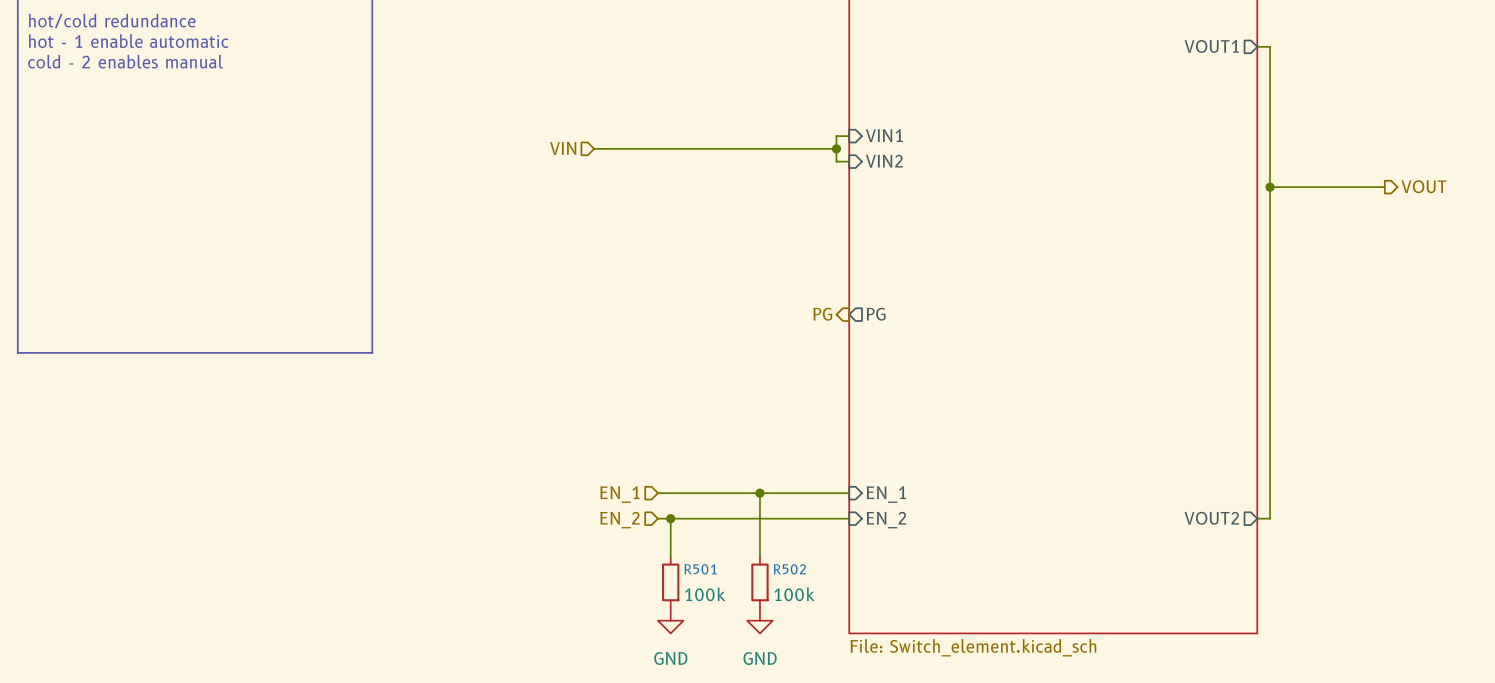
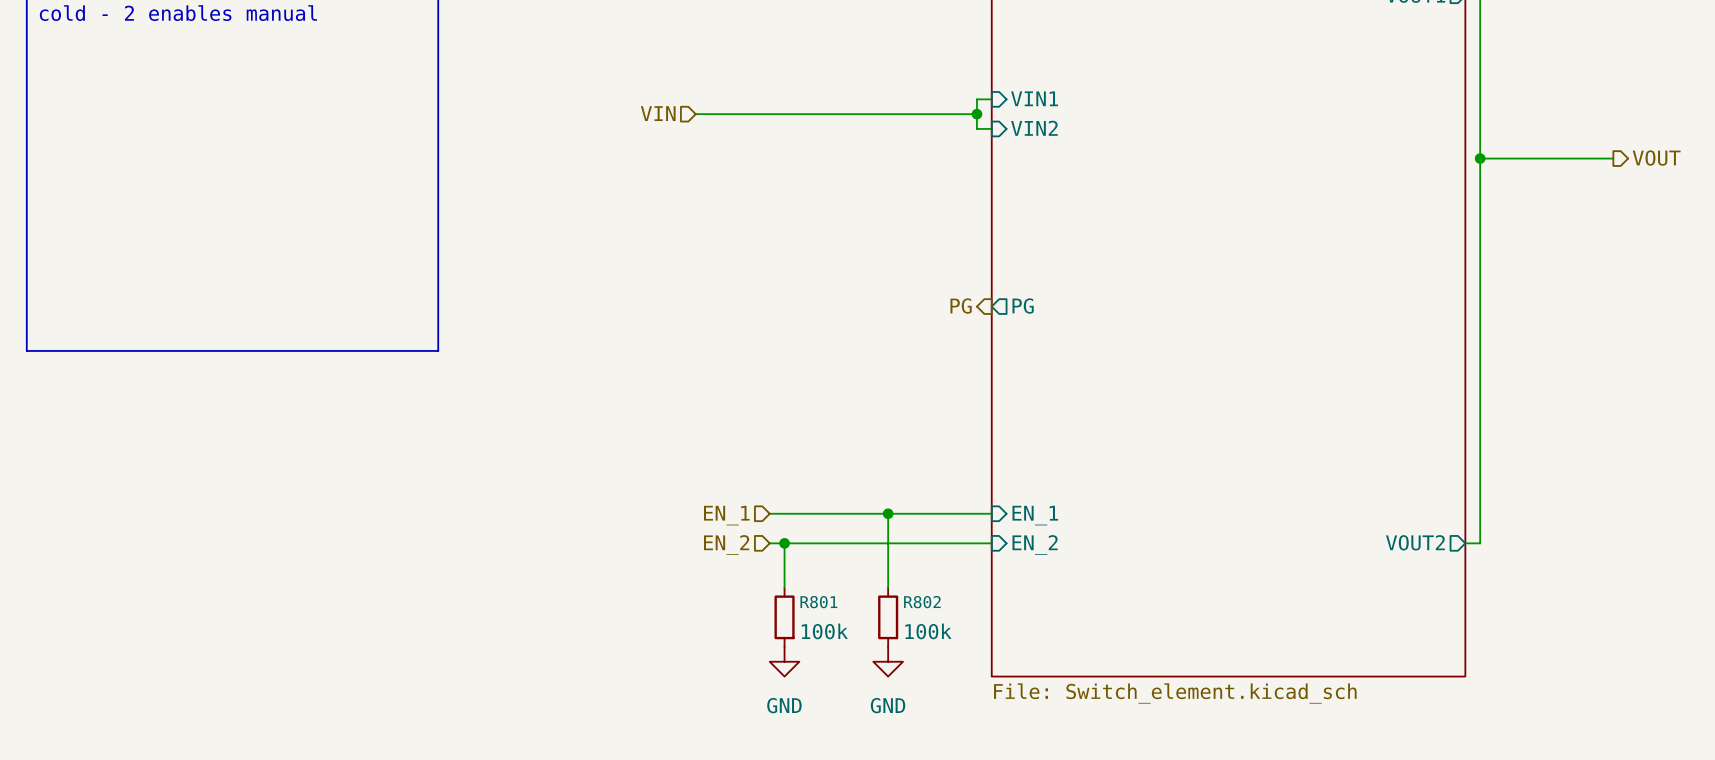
R501 name: R501 (700, 569) -> R801 (818, 602)
R502 name: R502 (789, 569) -> R802 (922, 602)

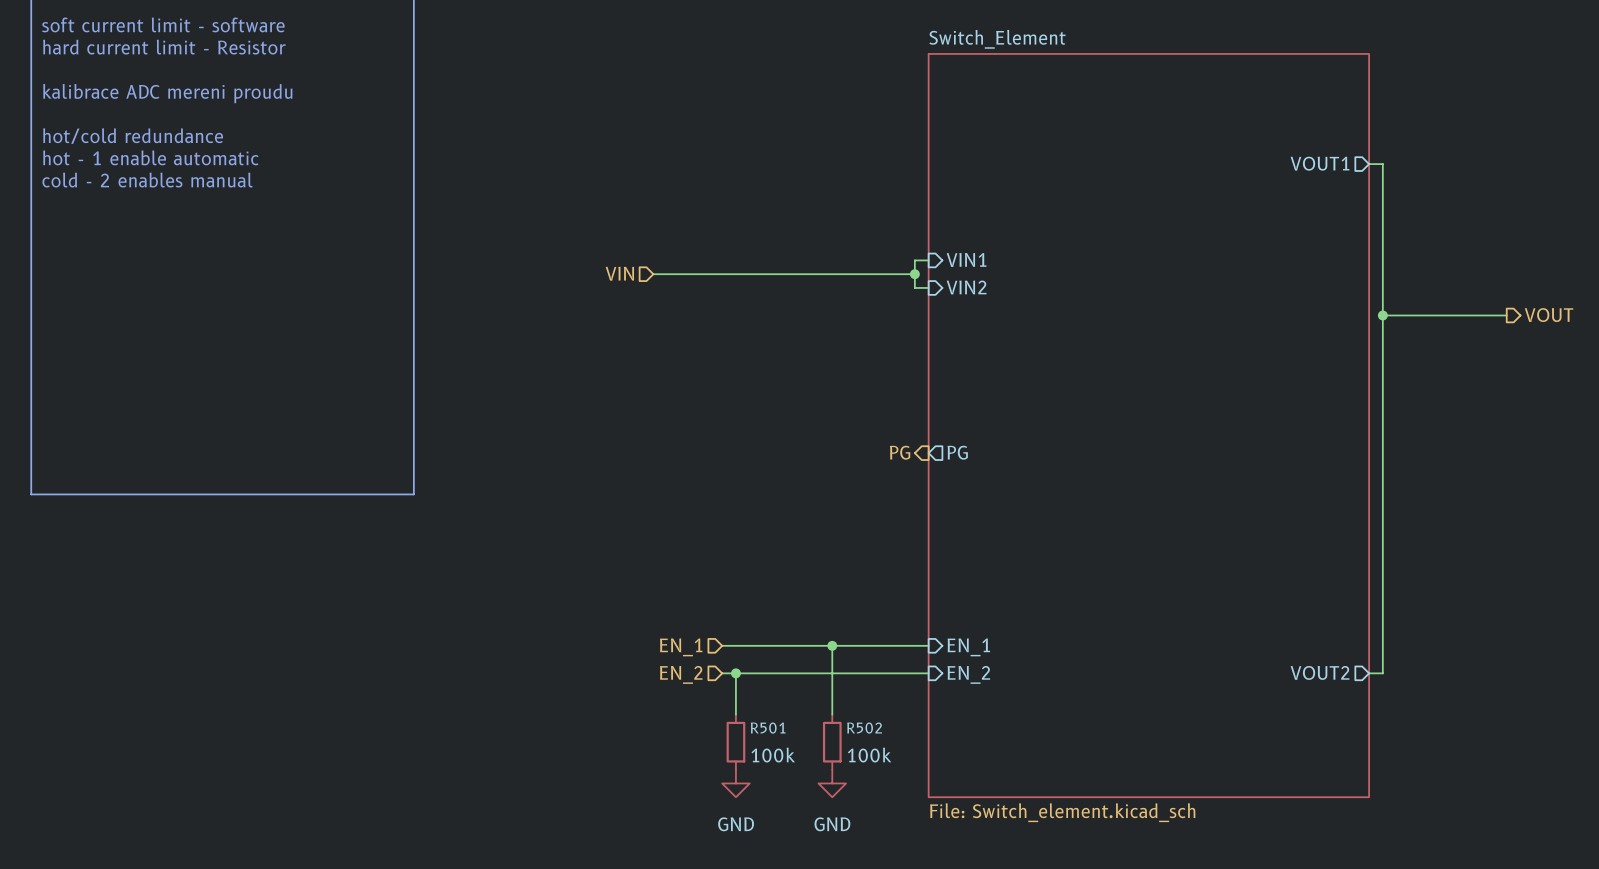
R801 name: R801 (818, 602) -> R501 (768, 728)
R802 name: R802 (922, 602) -> R502 (864, 728)

